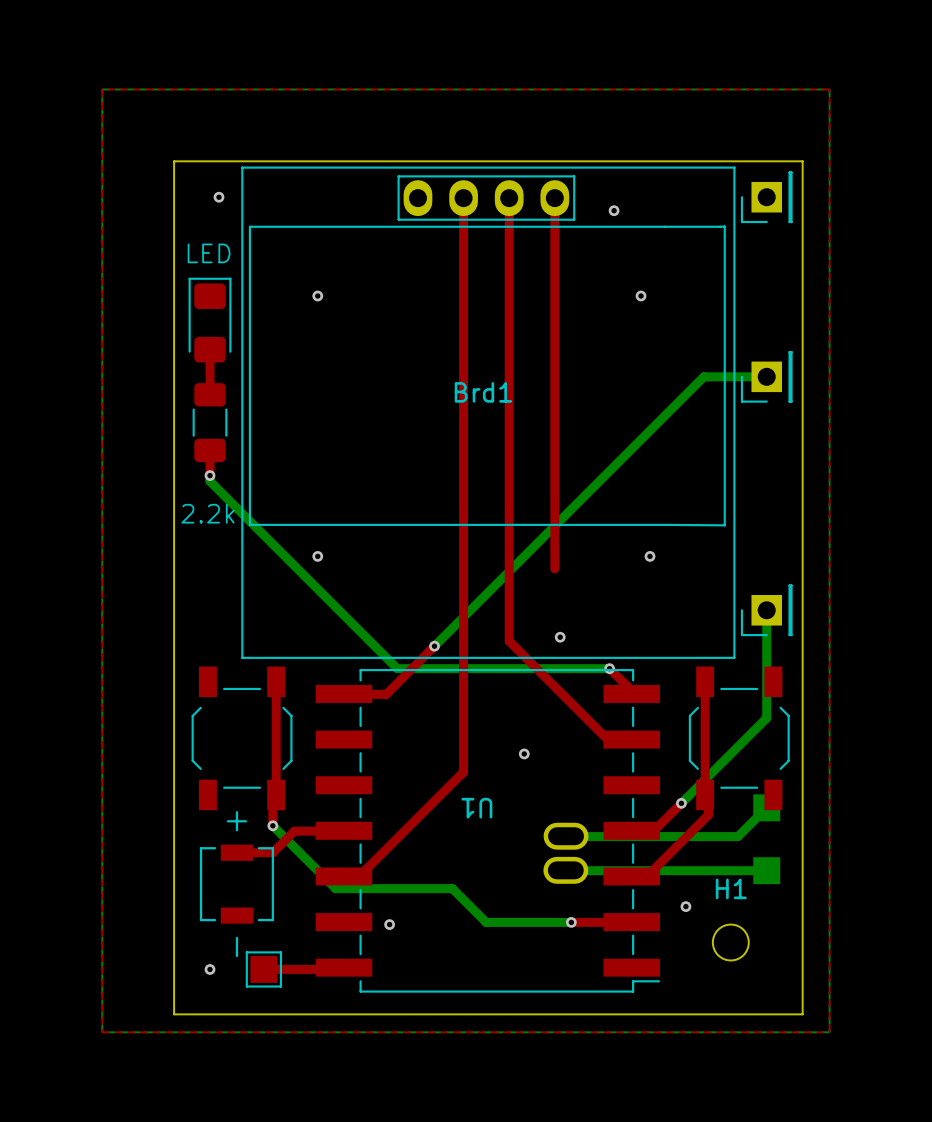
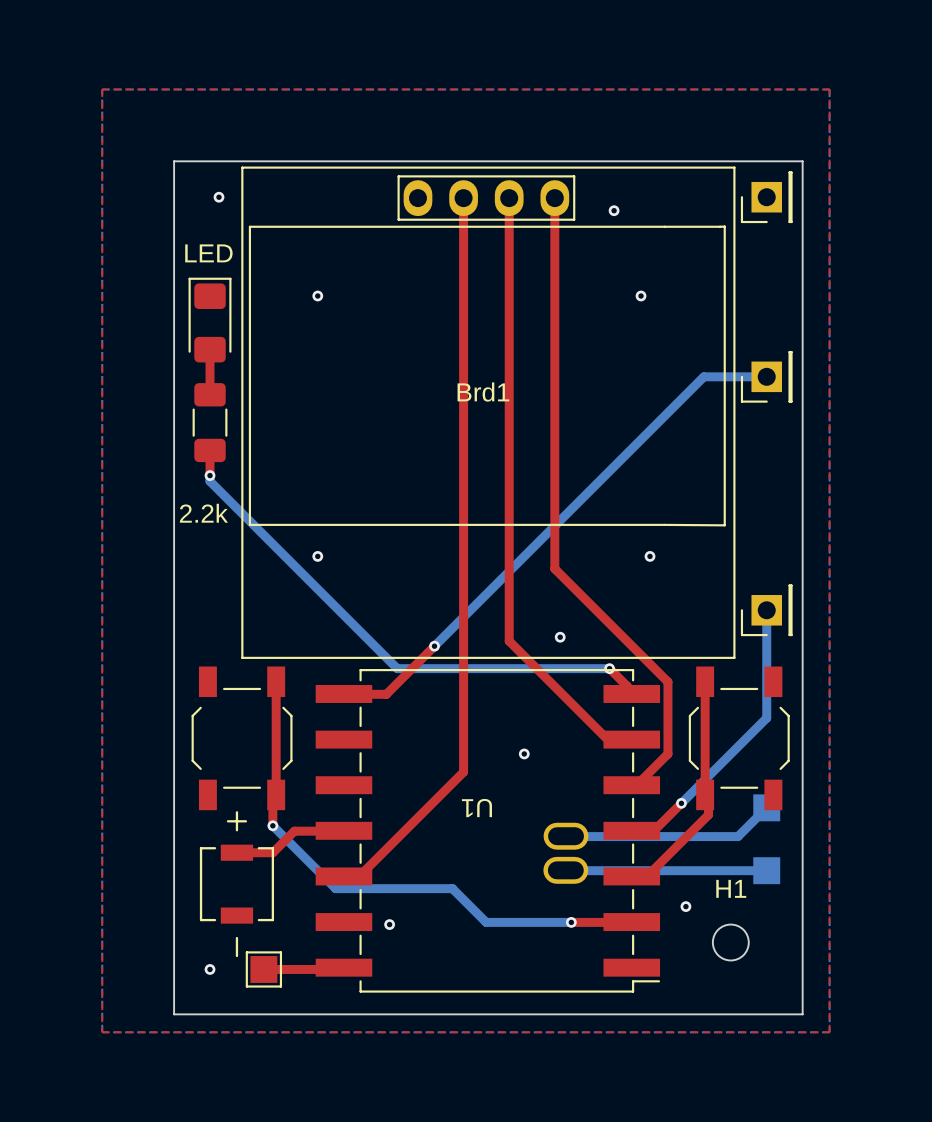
top track: none -> (554, 568) (667, 681) (667, 753) (636, 785)

